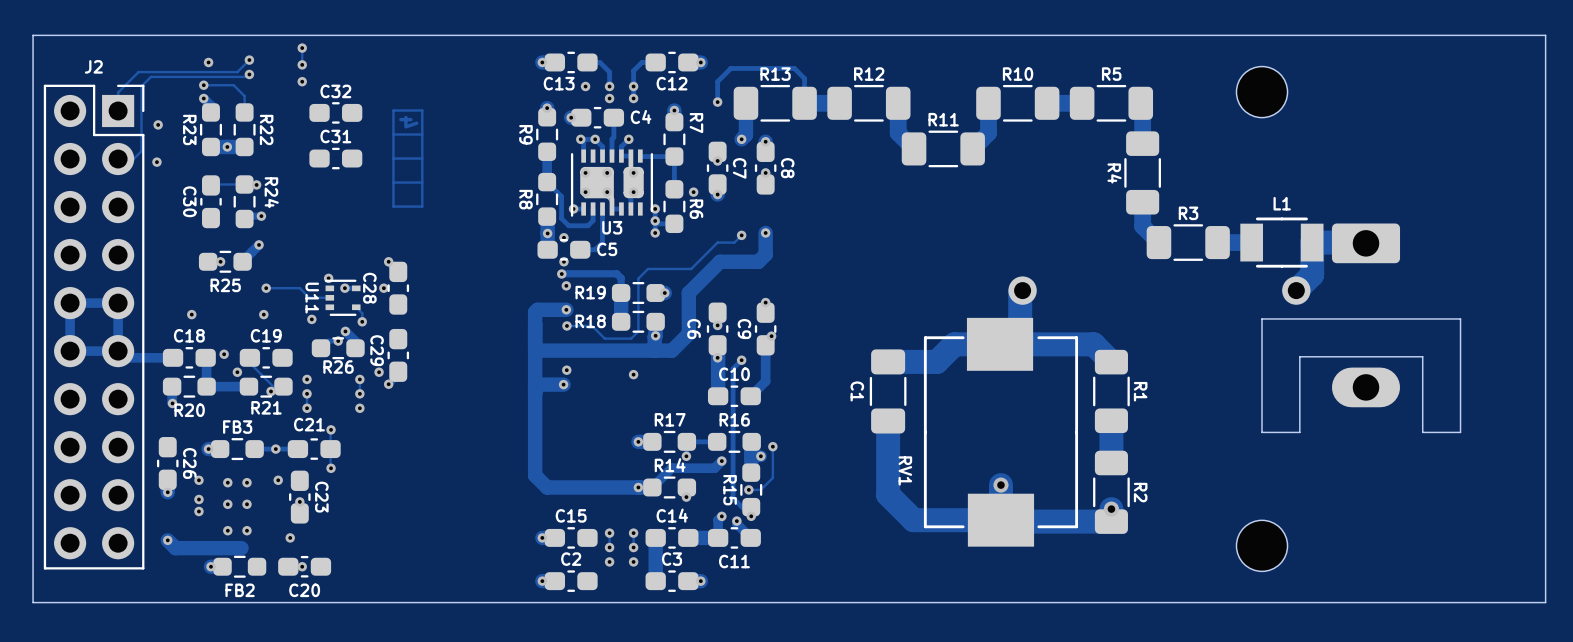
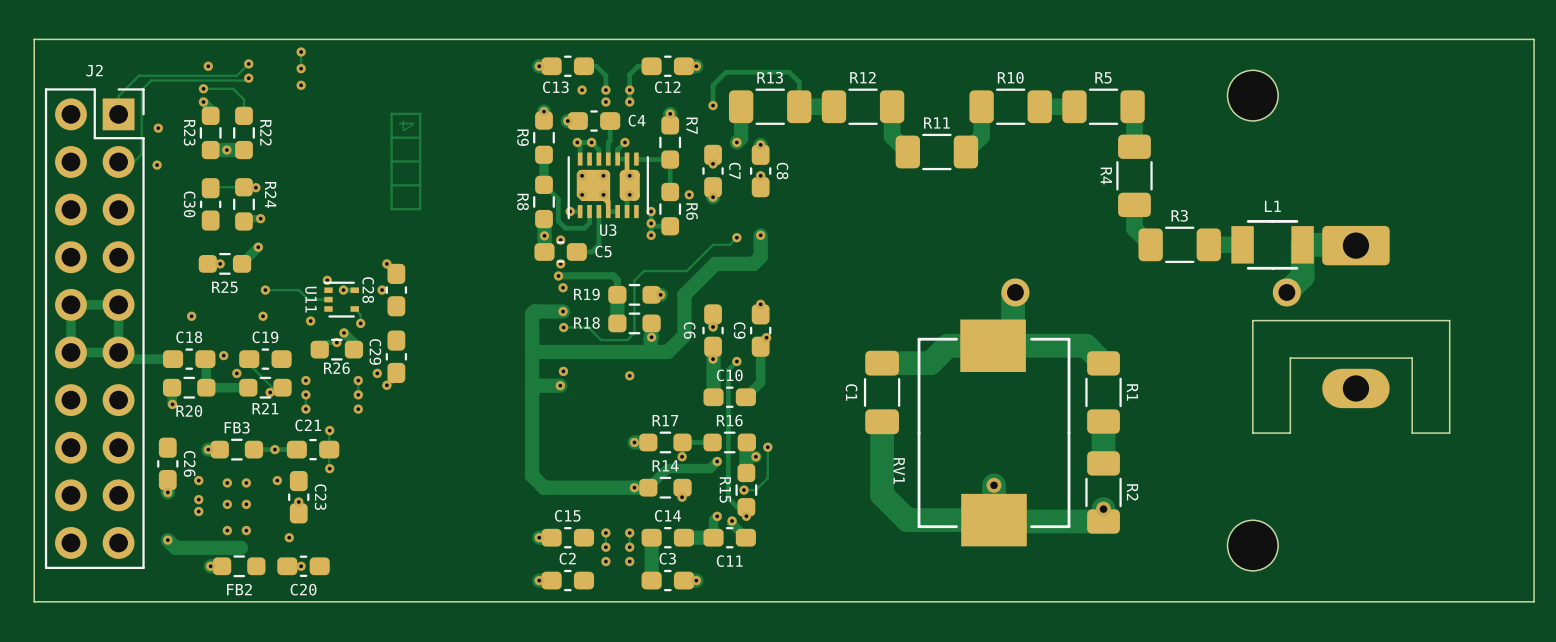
C32: (335, 112) -> none
C31: (335, 158) -> none

